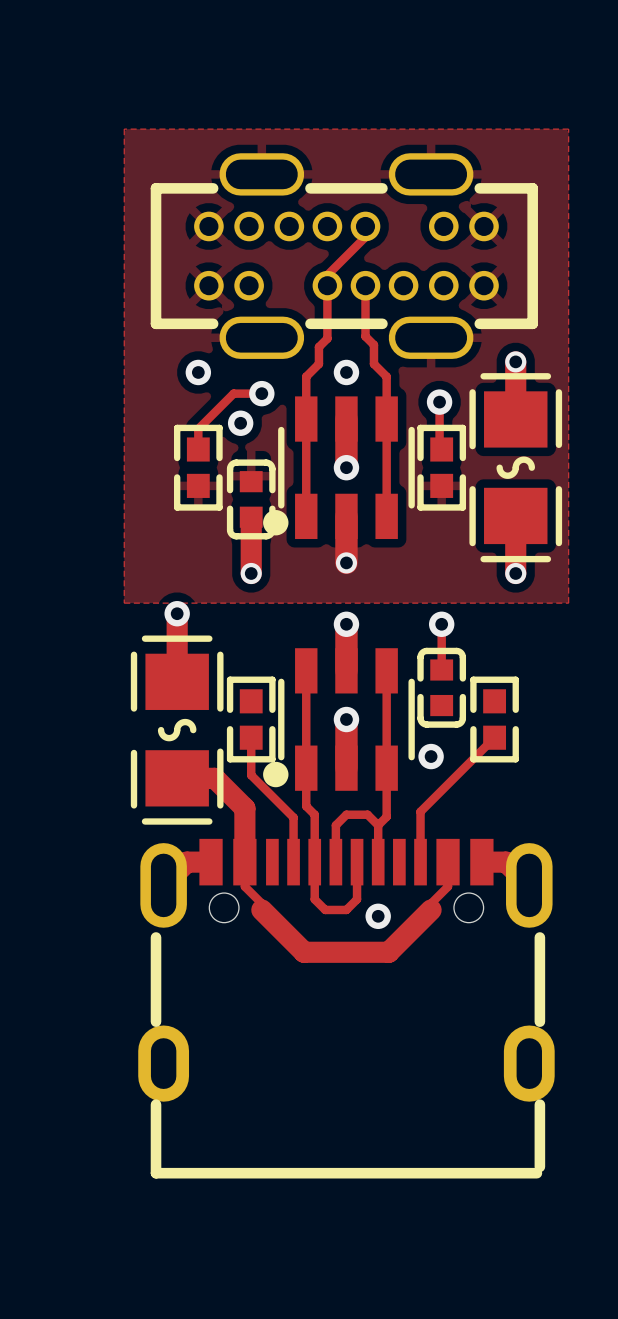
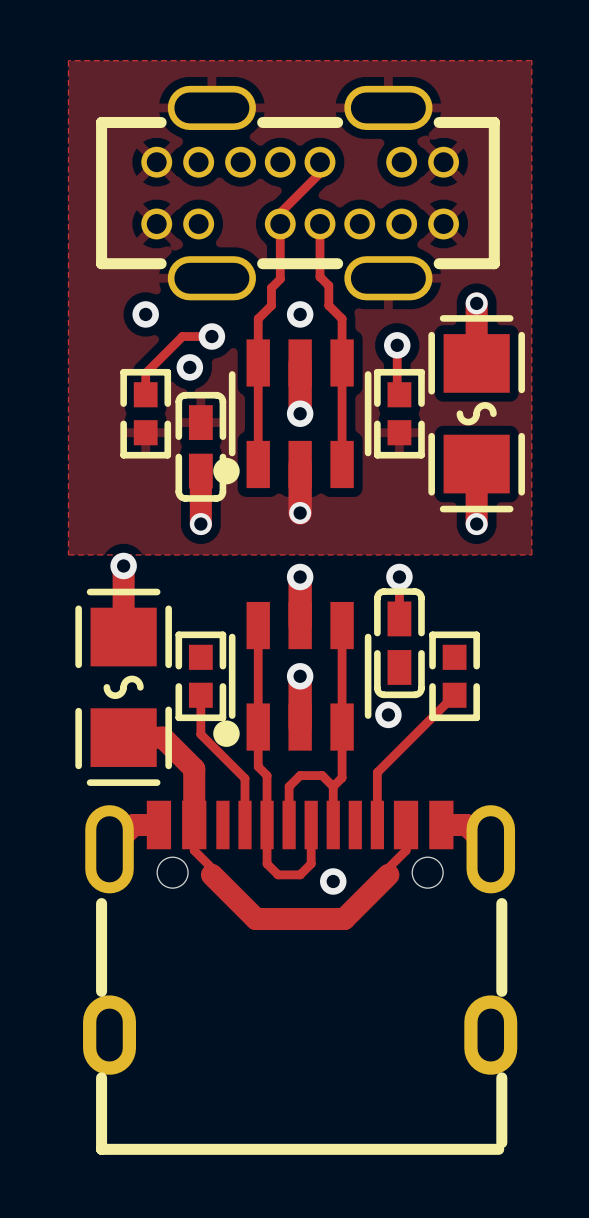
part footprint: [226, 459, 276, 540] -> [175, 391, 227, 502]
part footprint: [417, 647, 467, 728] -> [374, 588, 425, 699]

